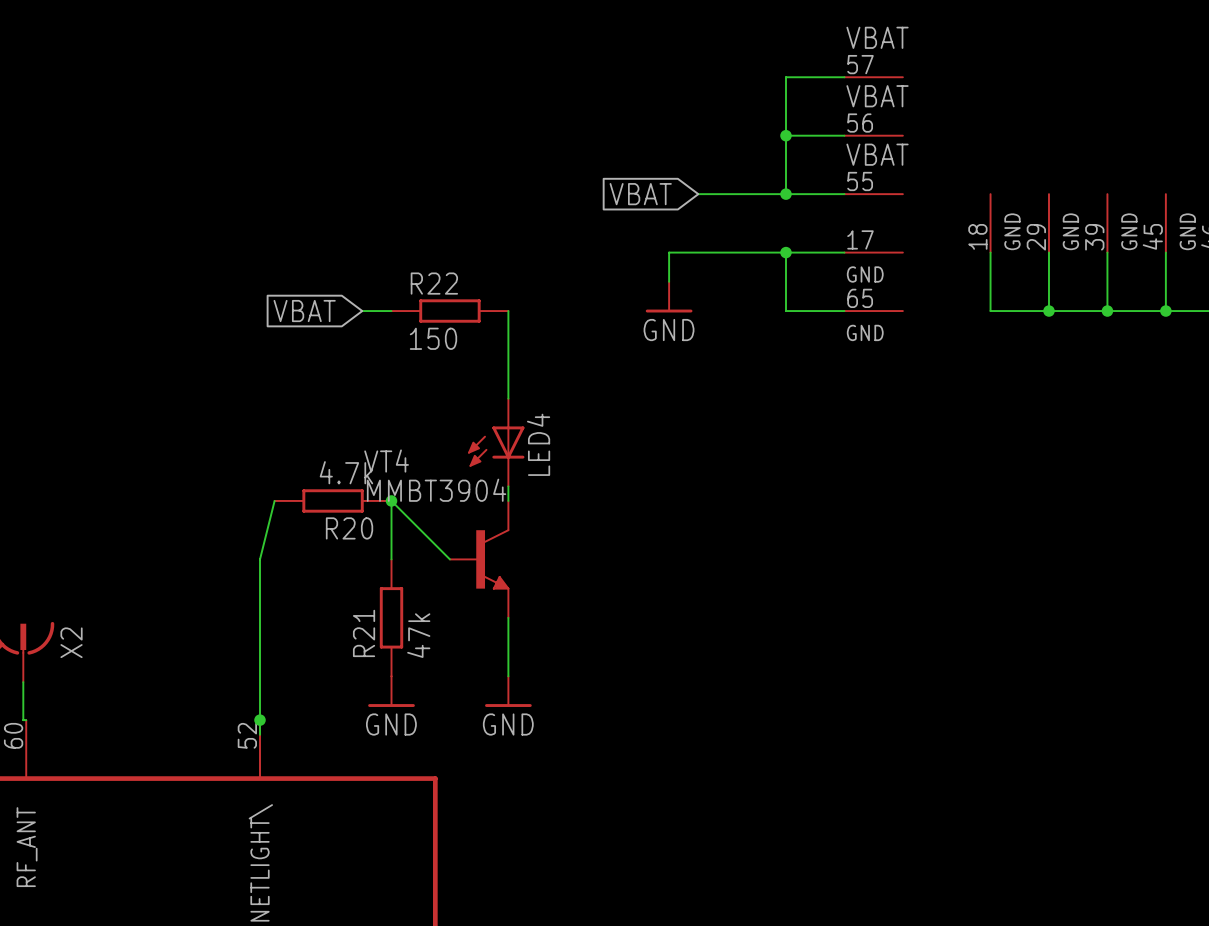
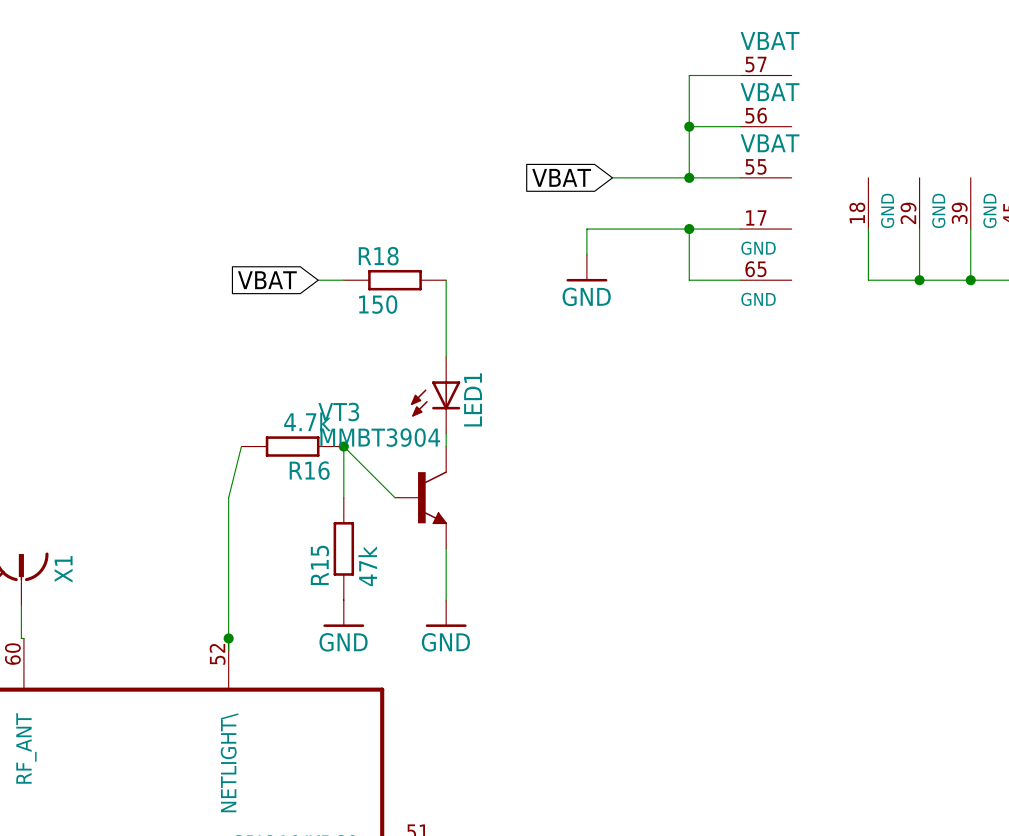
R22 name: R22 (434, 283) -> R18 (378, 256)
LED4 name: LED4 (538, 444) -> LED1 (473, 399)
VT4 name: VT4 (386, 461) -> VT3 (338, 412)
R20 name: R20 (349, 528) -> R16 (309, 470)
R21 name: R21 (364, 633) -> R15 (319, 565)
X2 name: X2 (71, 642) -> X1 (63, 569)

